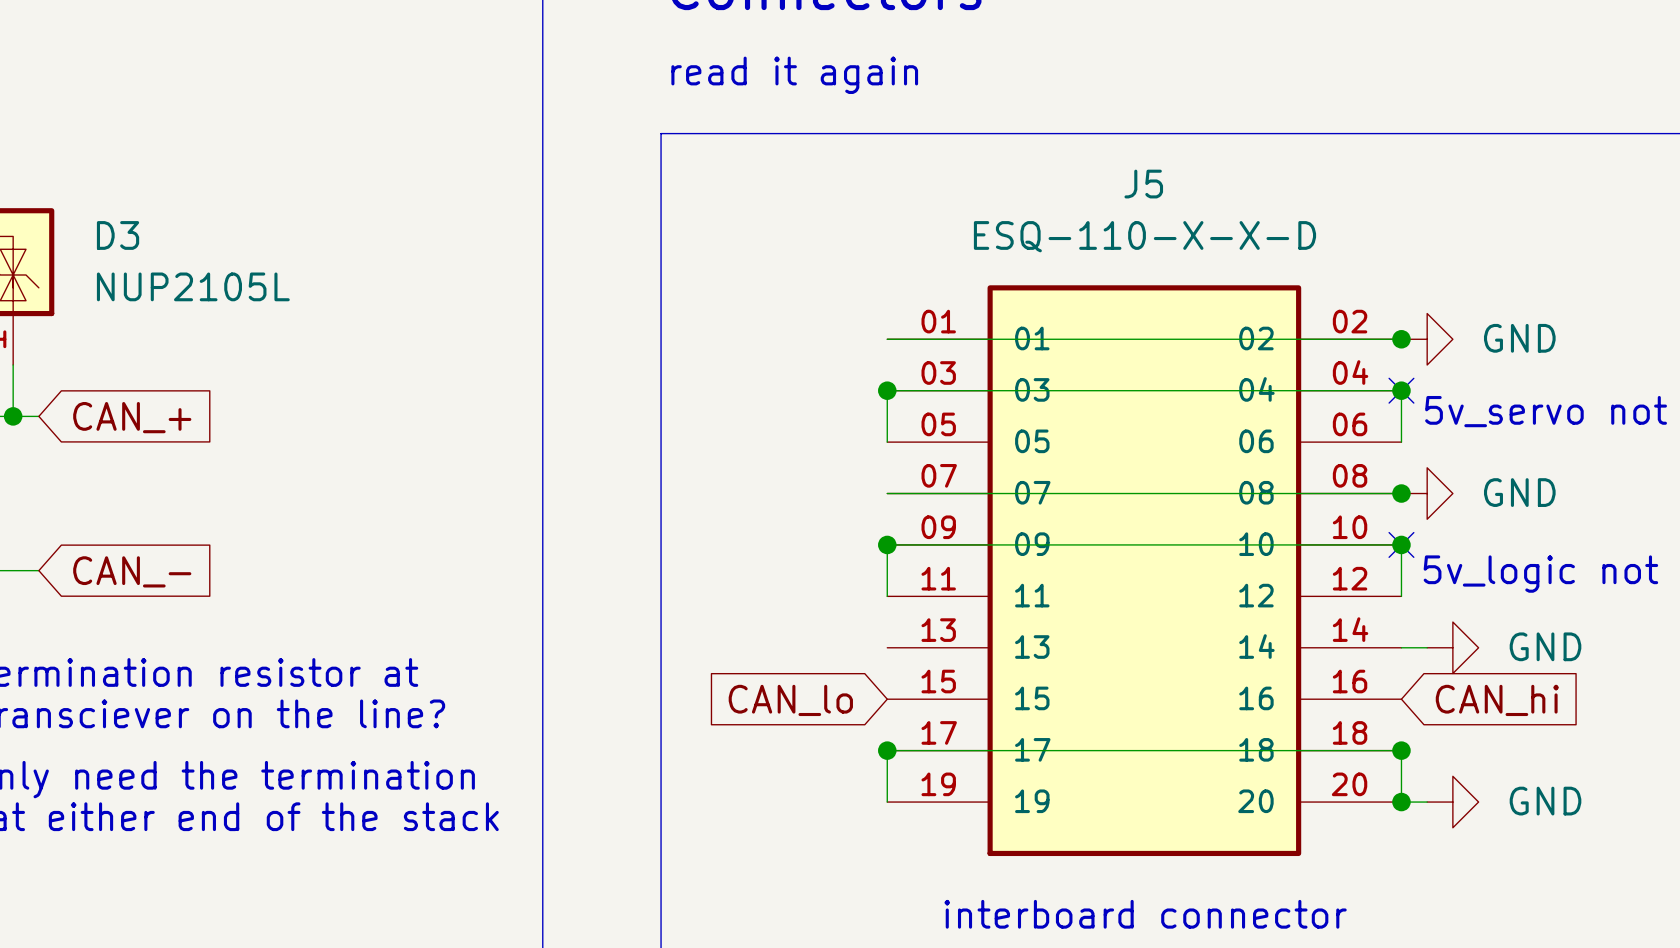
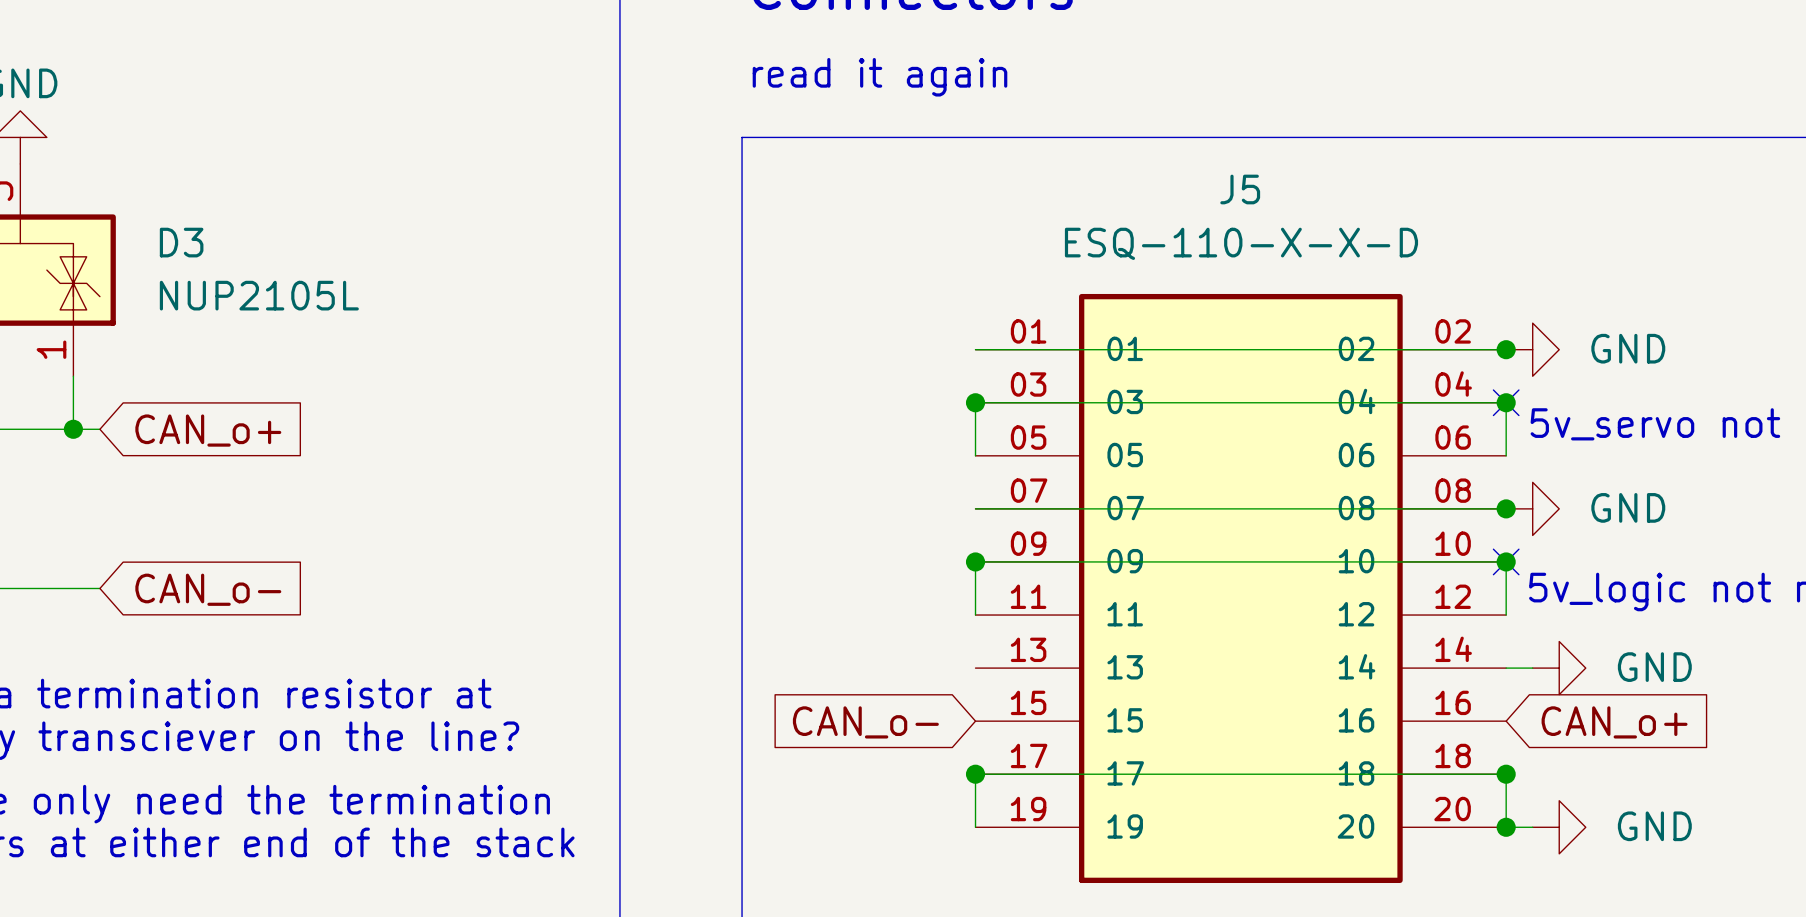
global label: CAN_+ (132, 417) -> CAN_o+ (208, 430)
global label: CAN_- (132, 571) -> CAN_o- (208, 589)
global label: CAN_lo (790, 700) -> CAN_o- (865, 722)
global label: CAN_hi (1497, 700) -> CAN_o+ (1614, 722)

